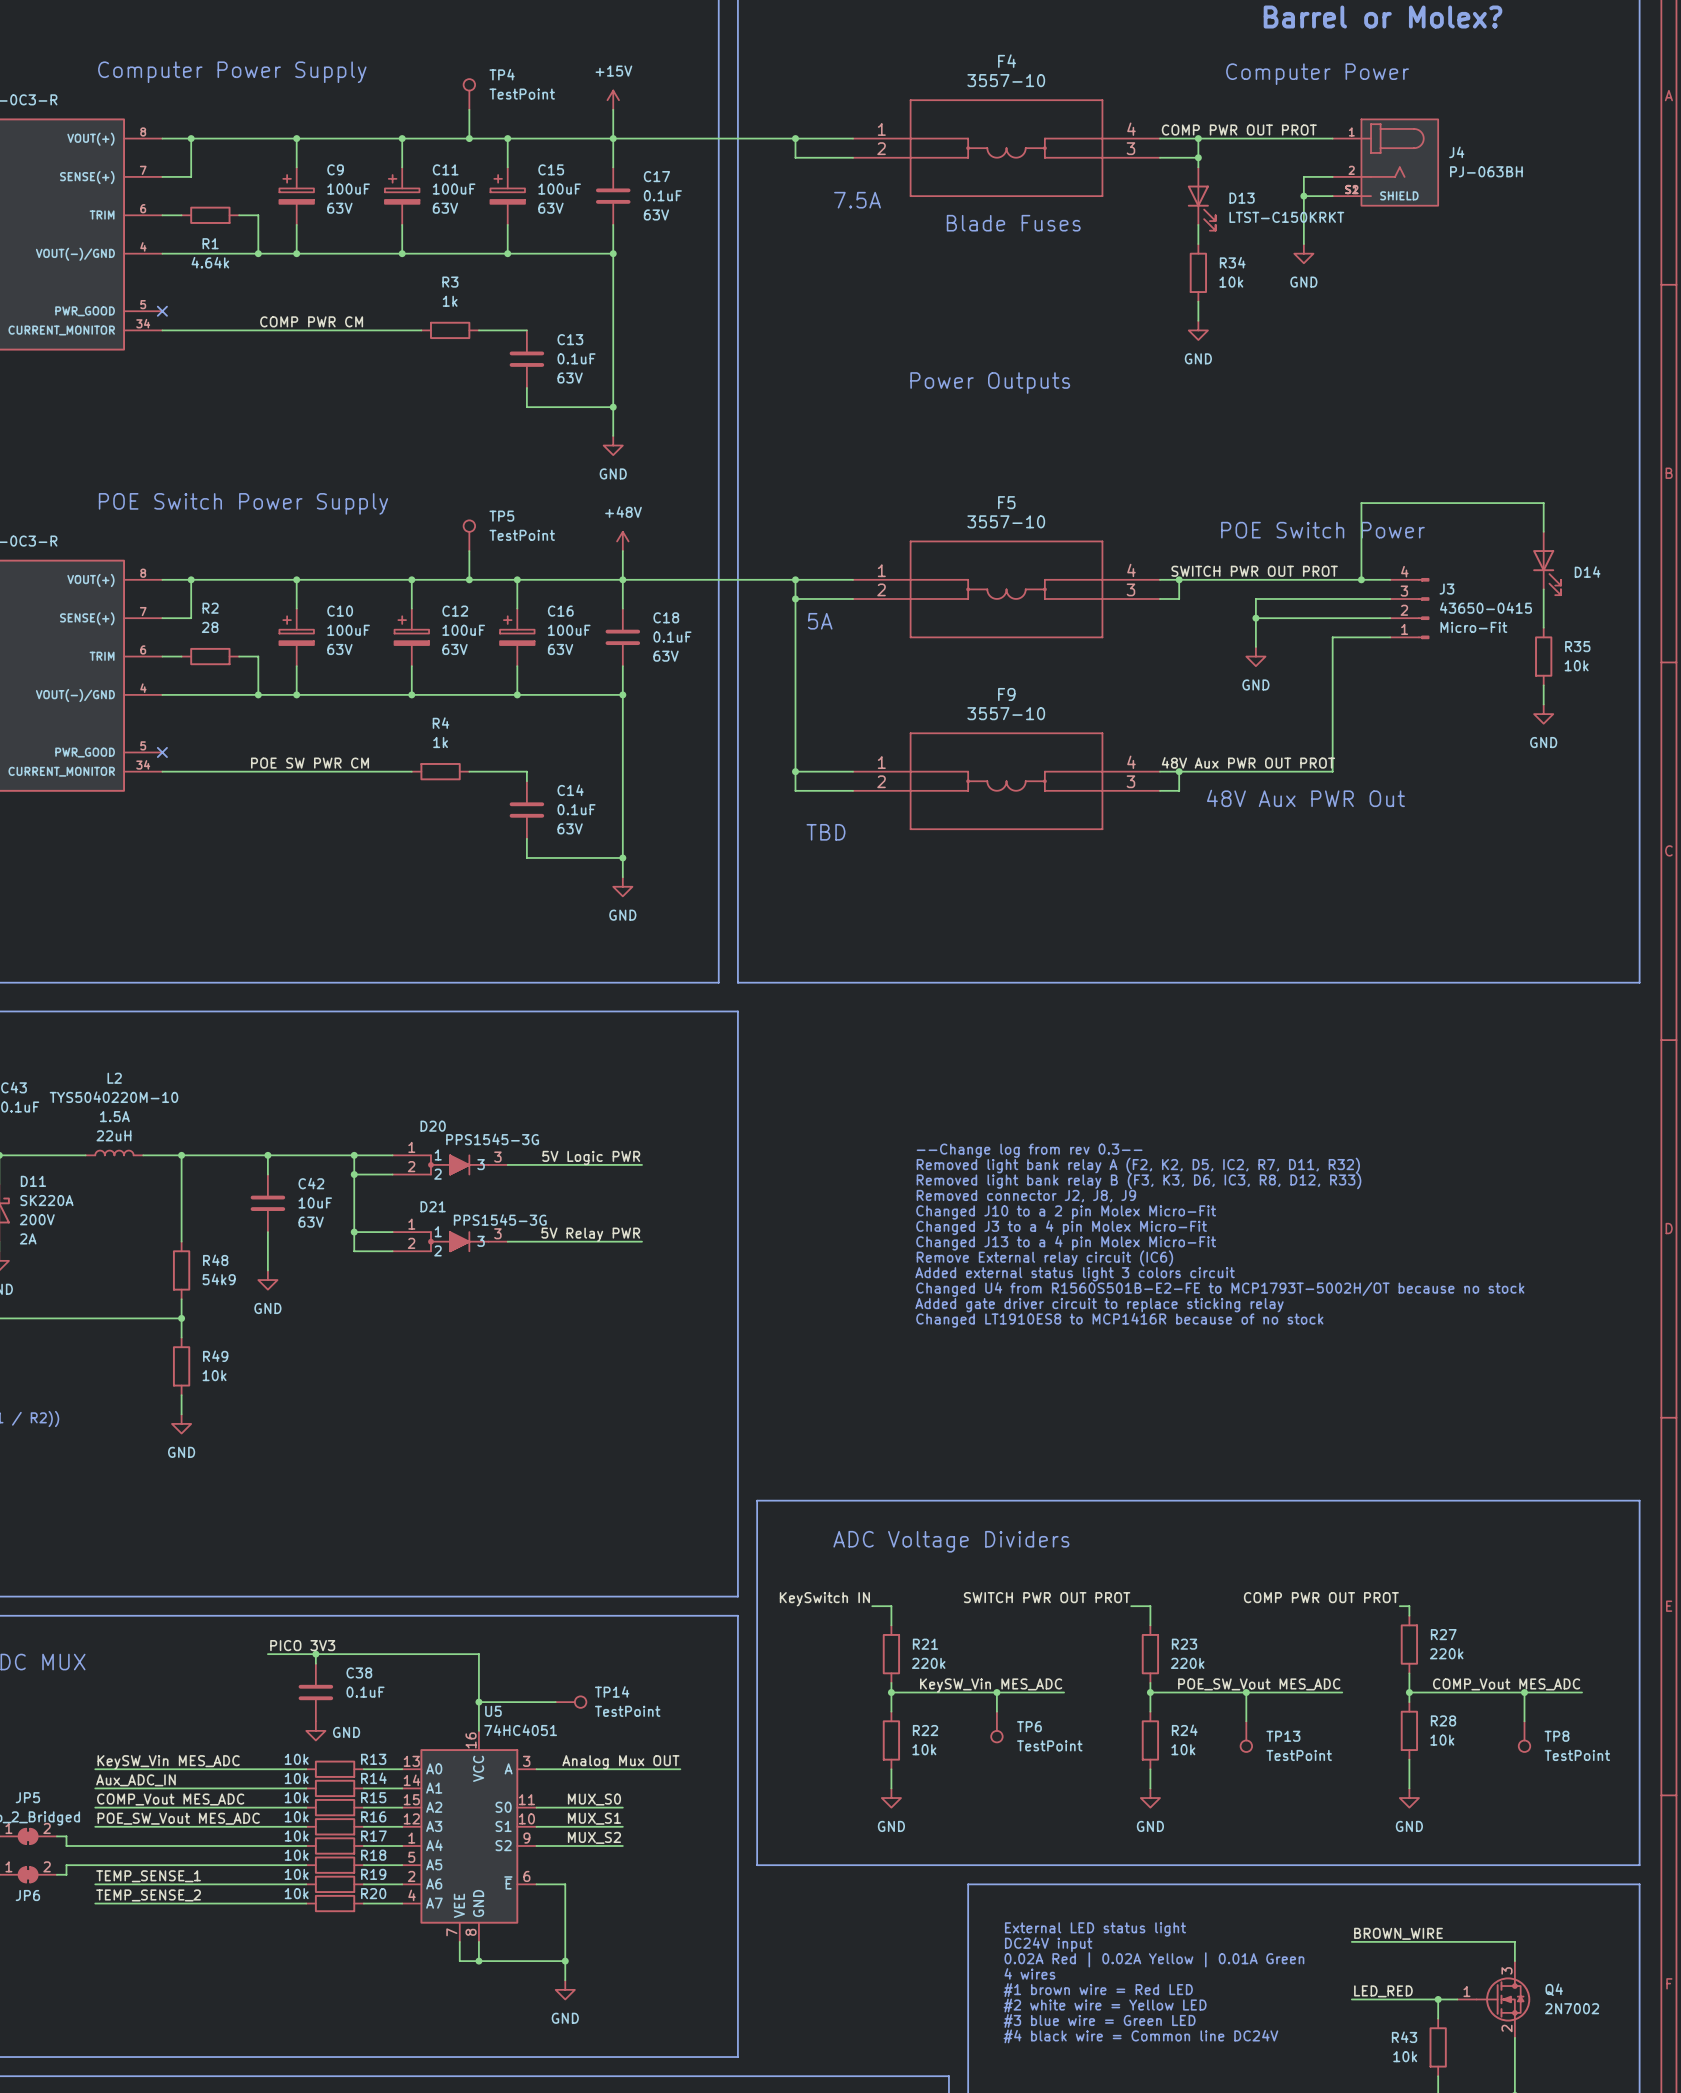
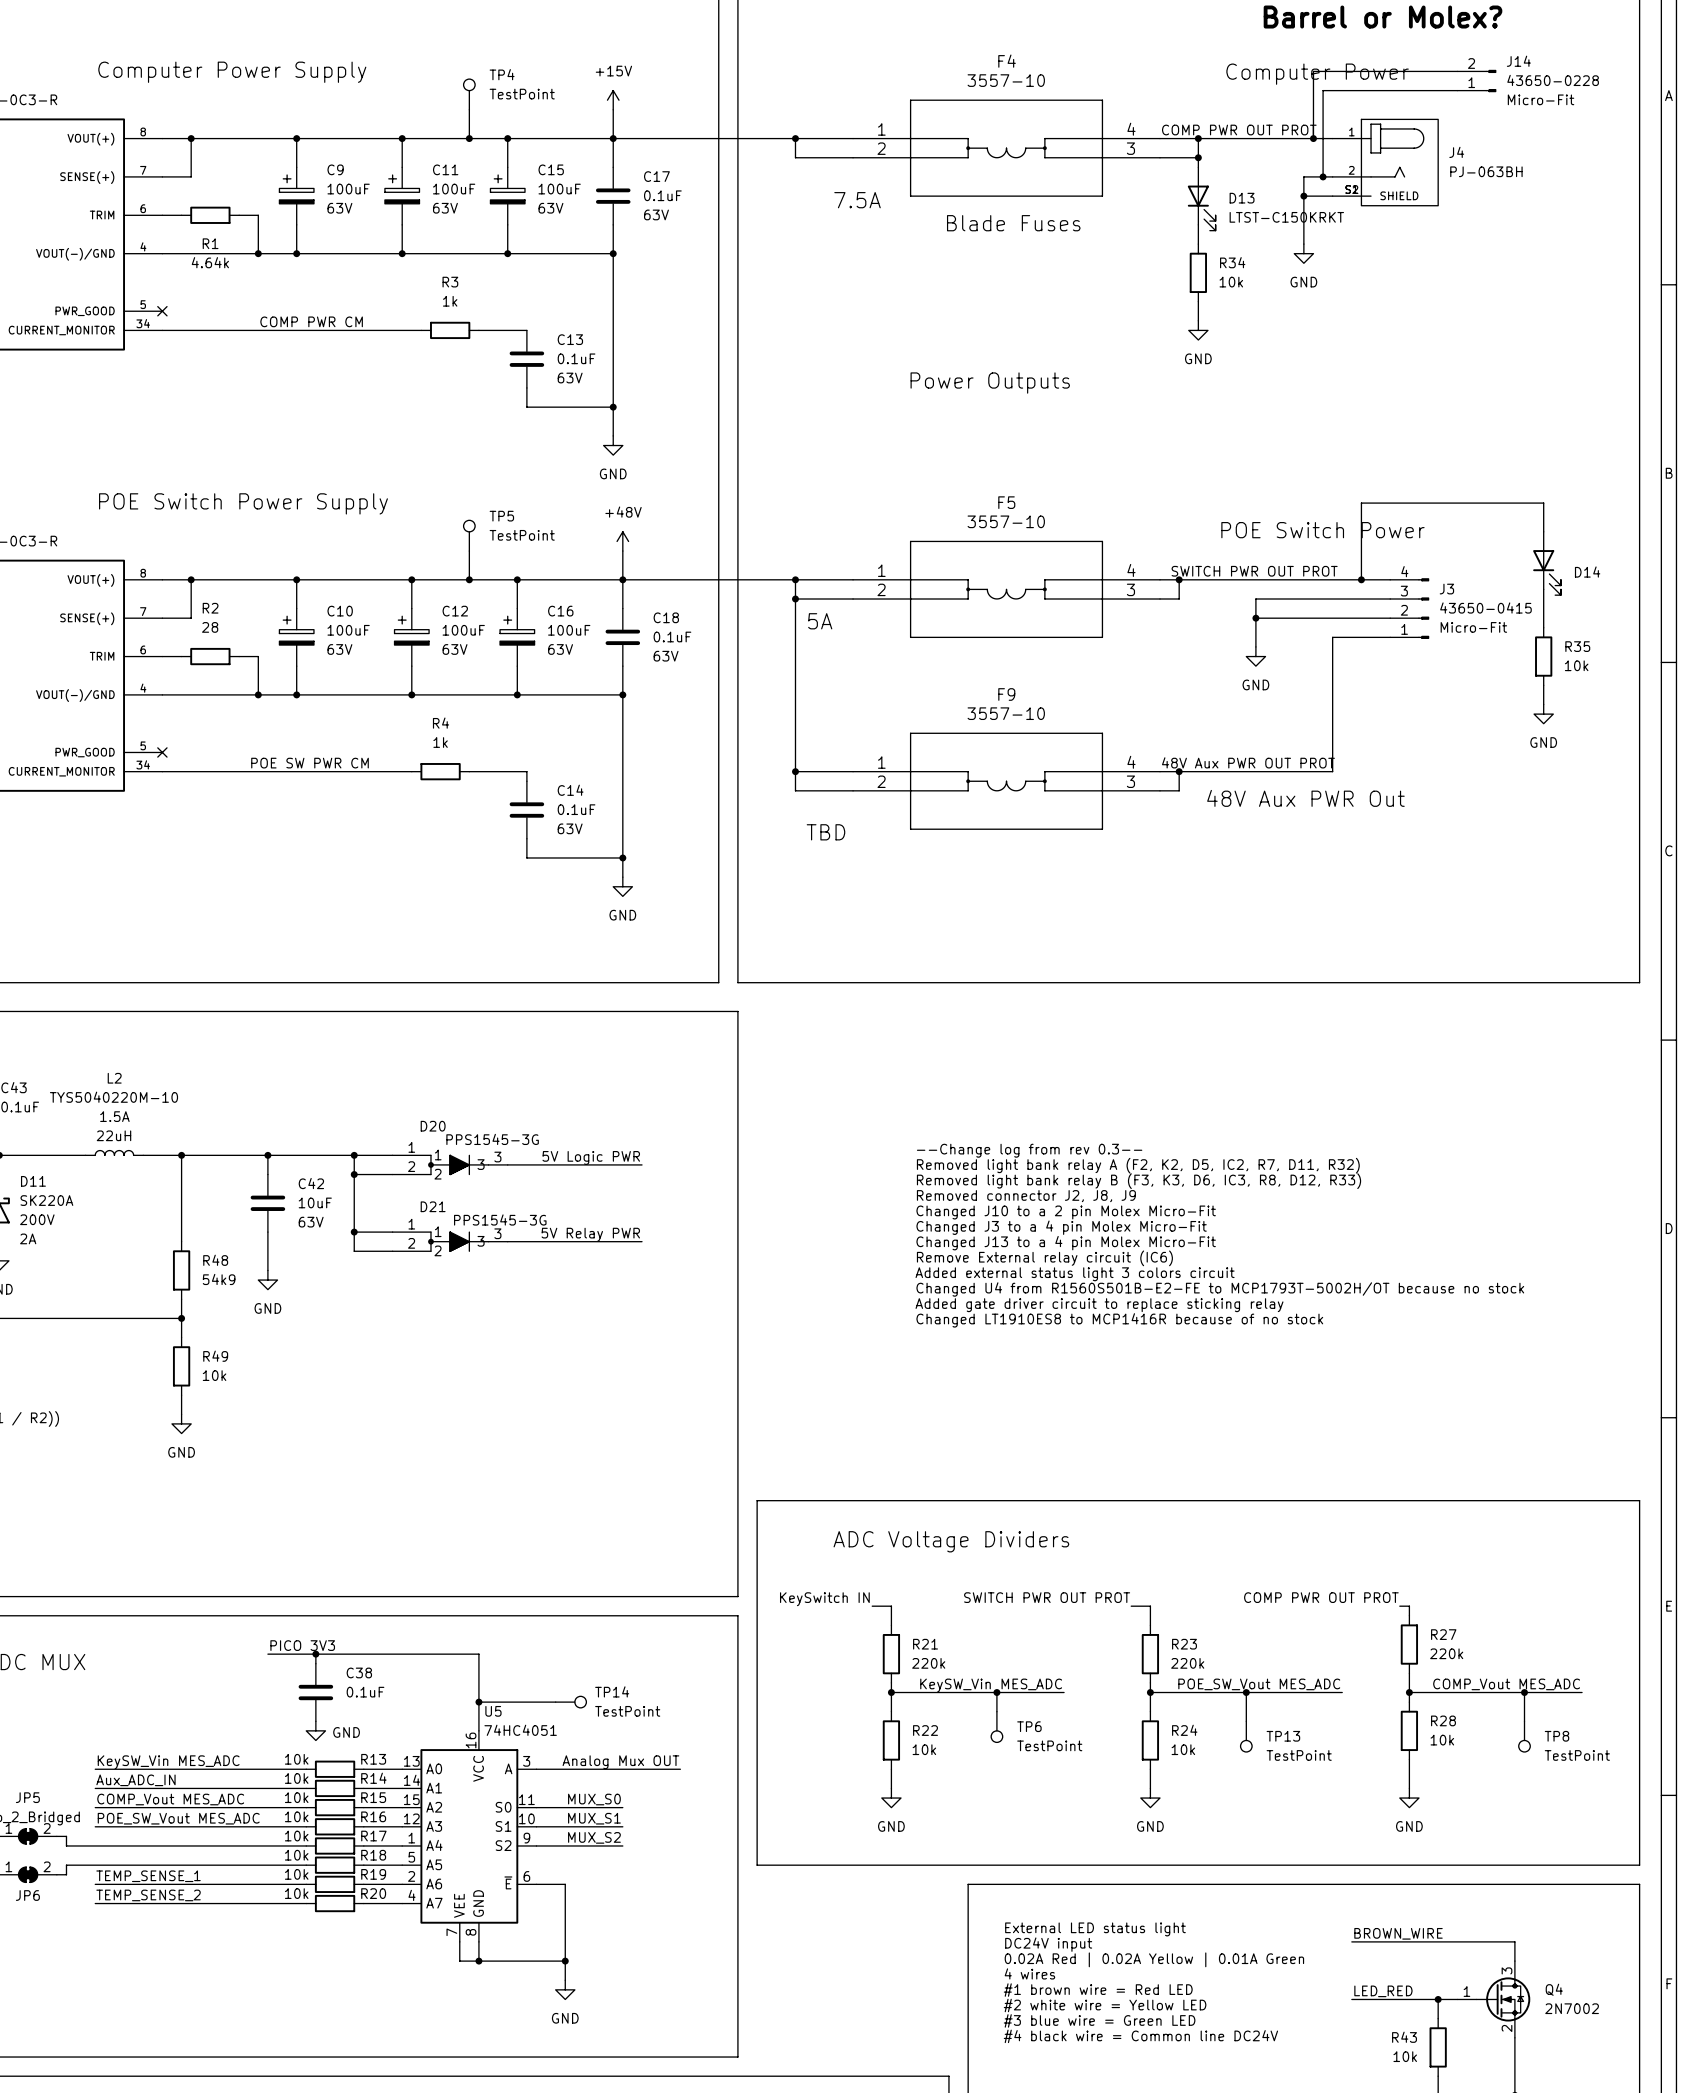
wire: none -> (1457, 71) (1313, 71) (1313, 138)
J14: none -> 43650-0228 (1476, 81)
wire: none -> (1457, 90) (1323, 90) (1323, 176)
junction: none -> (1313, 138)
junction: none -> (1323, 176)

